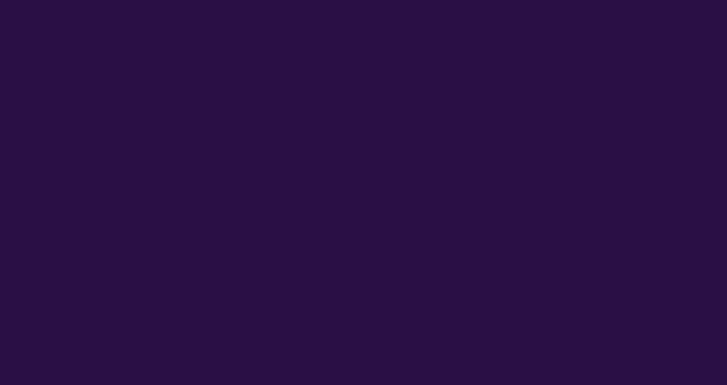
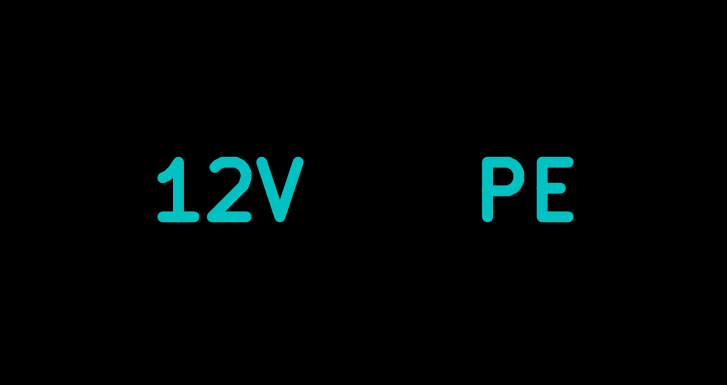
text: none -> 12V (230, 189)
text: none -> PE (527, 189)

